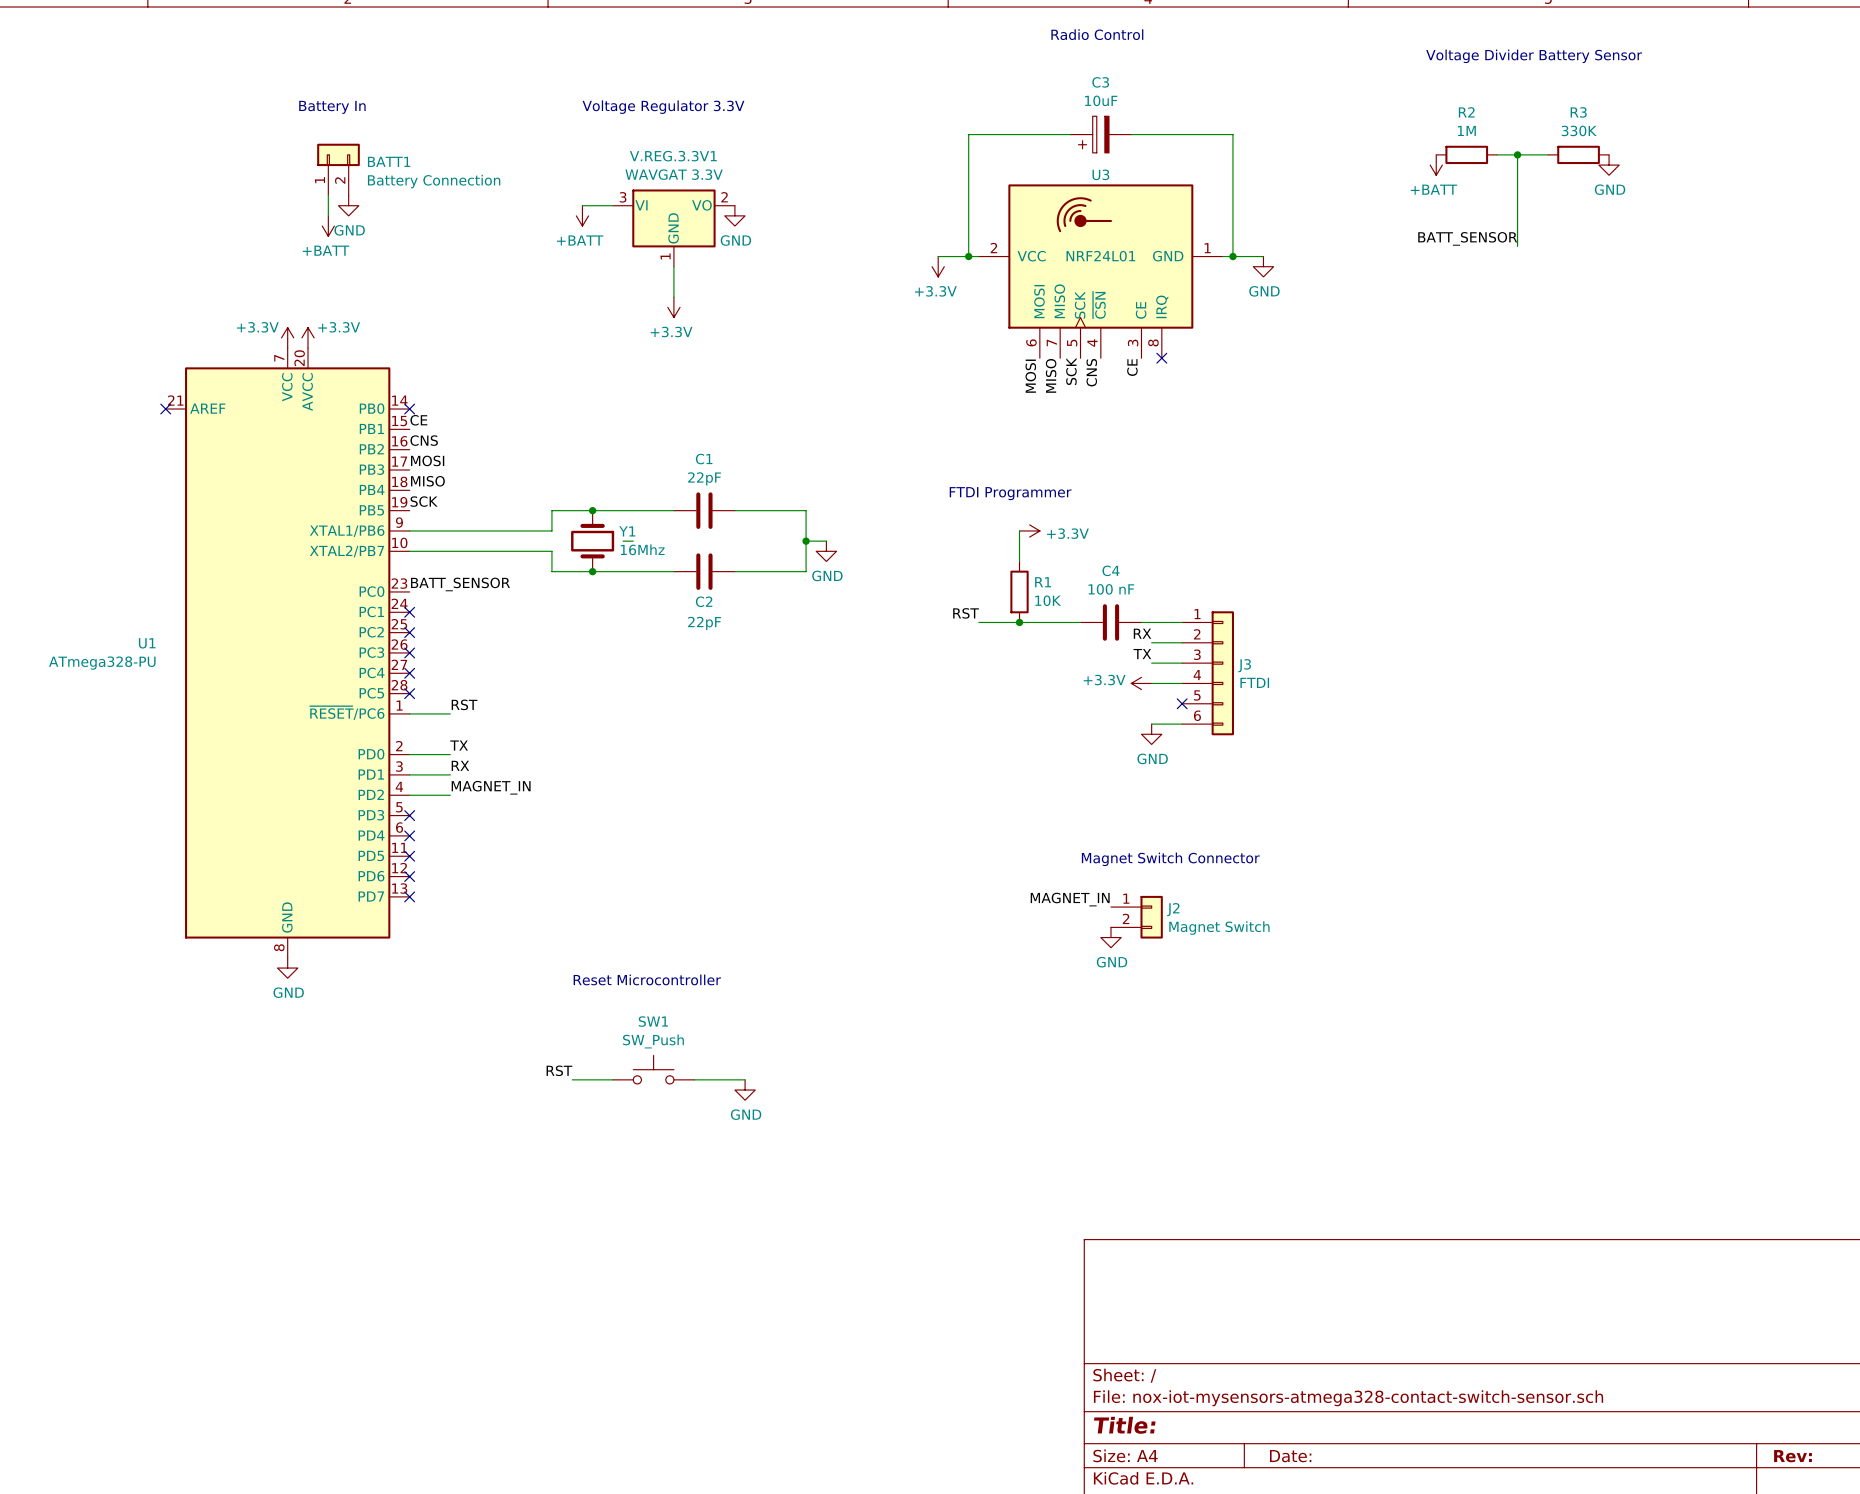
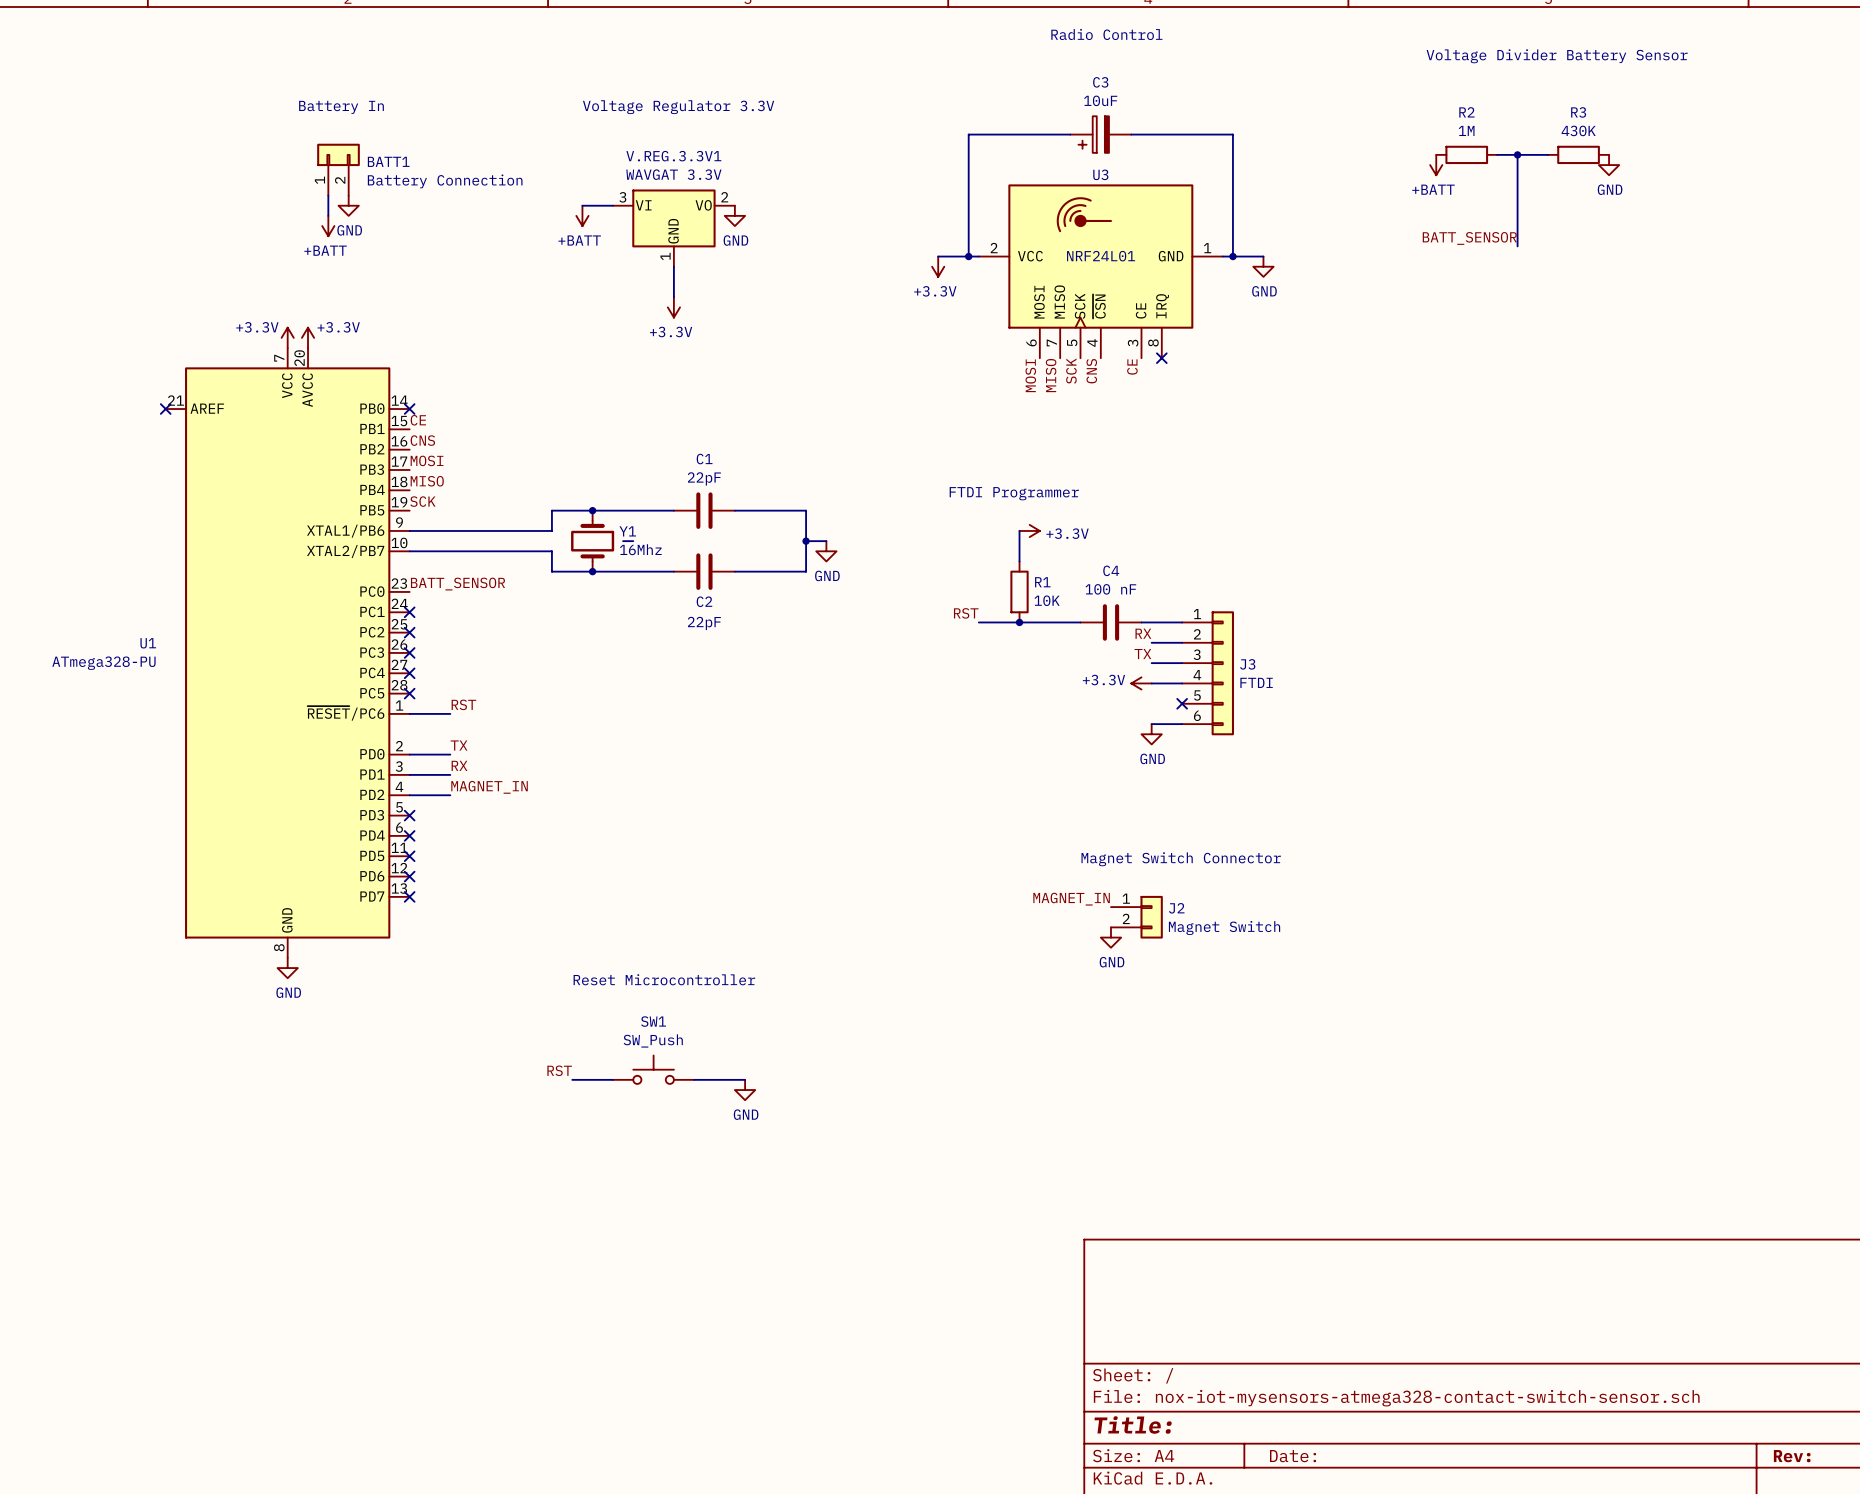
R3 value: 330K (1579, 130) -> 430K (1578, 130)

